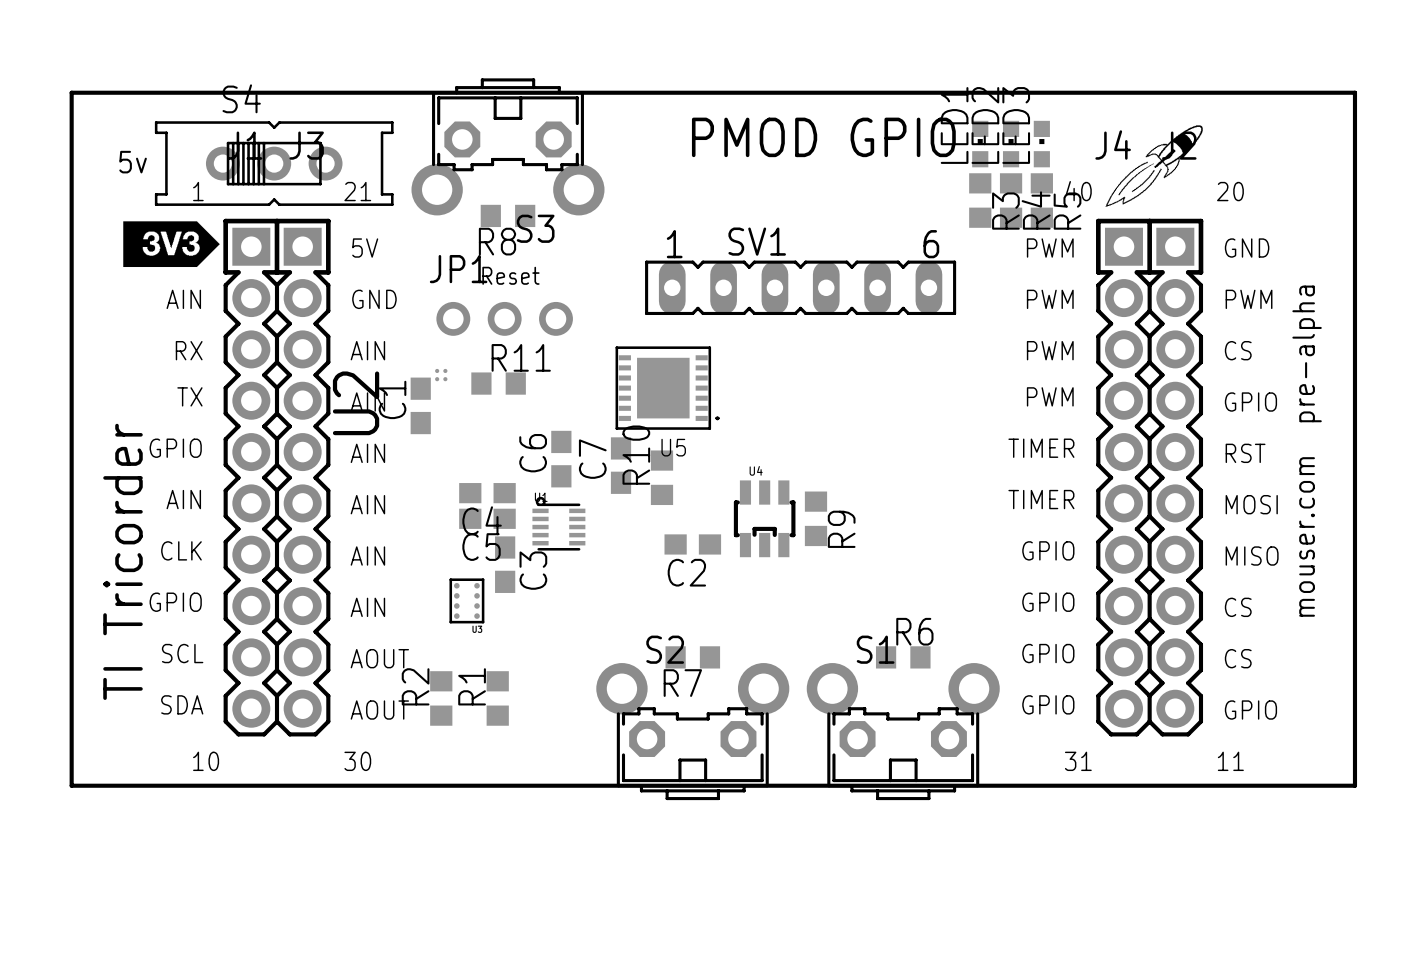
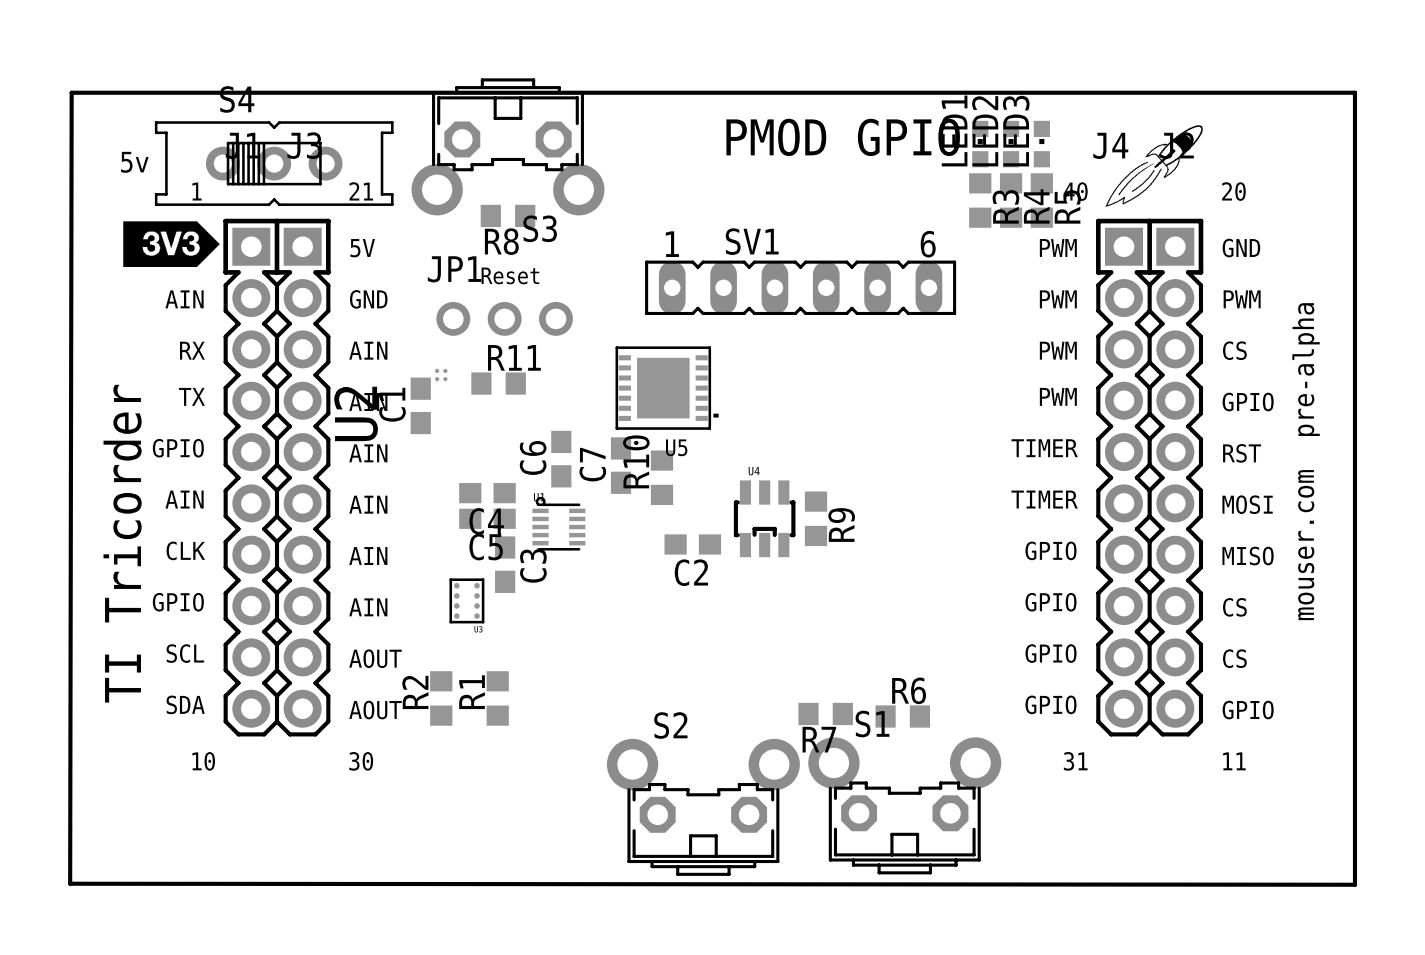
board edge: (71, 92) (71, 785) (1354, 785) -> (71, 92) (70, 883) (1354, 884) (1354, 785)
R7 position: (692, 657) -> (825, 713)
R6 position: (903, 657) -> (902, 716)
S2 position: (692, 731) -> (703, 807)
S1 position: (903, 731) -> (904, 805)

